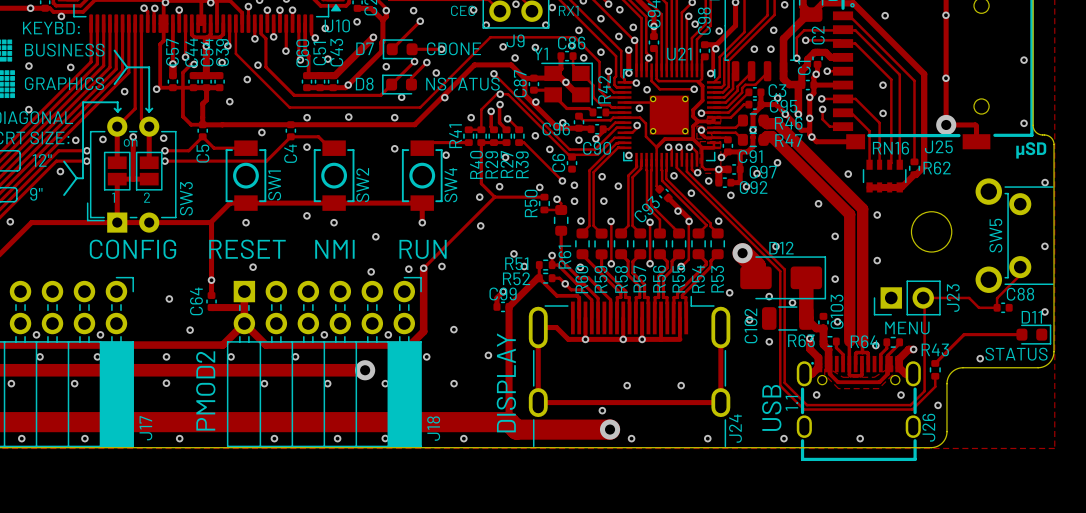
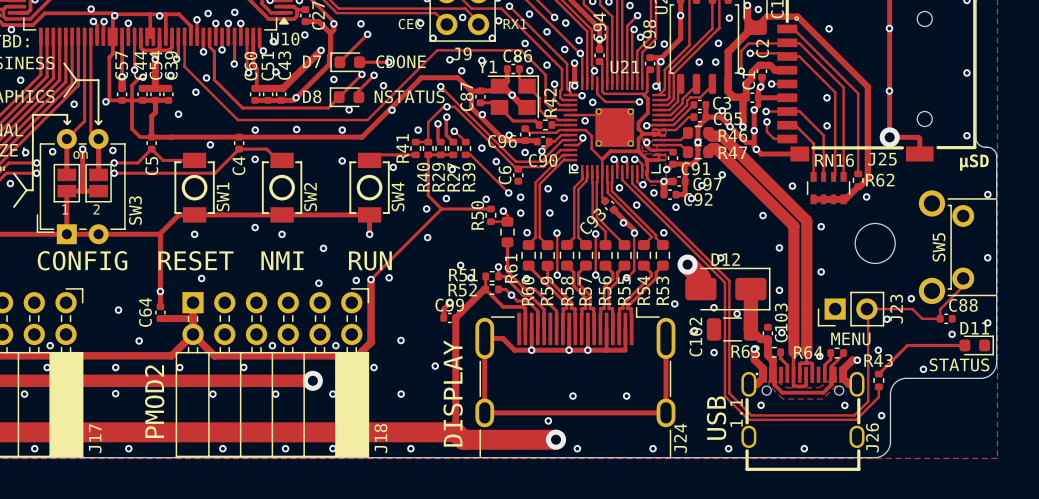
via: none -> (866, 196)
via: none -> (911, 298)
via: none -> (886, 319)
via: none -> (952, 334)
via: none -> (878, 350)

